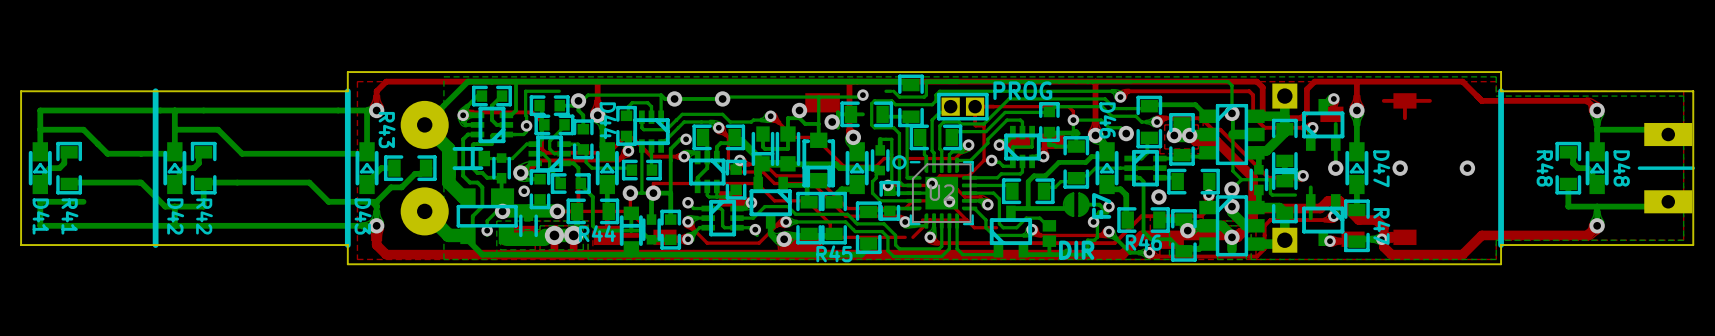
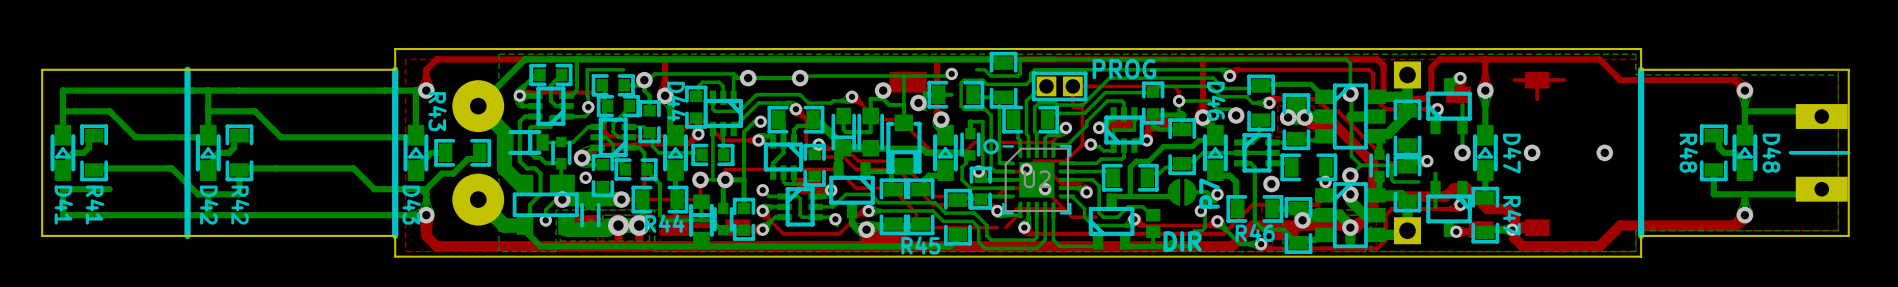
text: F7 (1101, 205) -> P7 (1209, 193)

